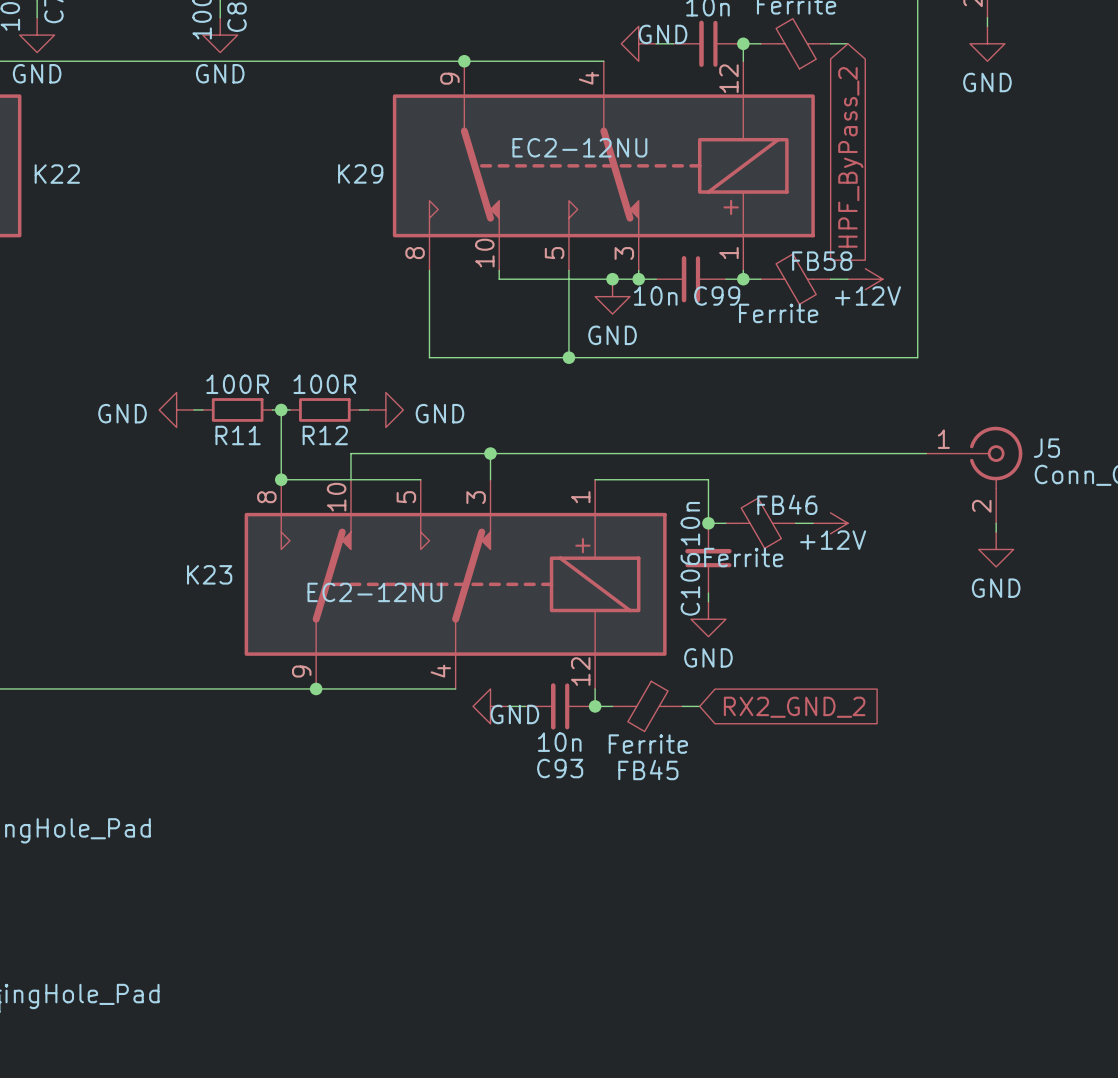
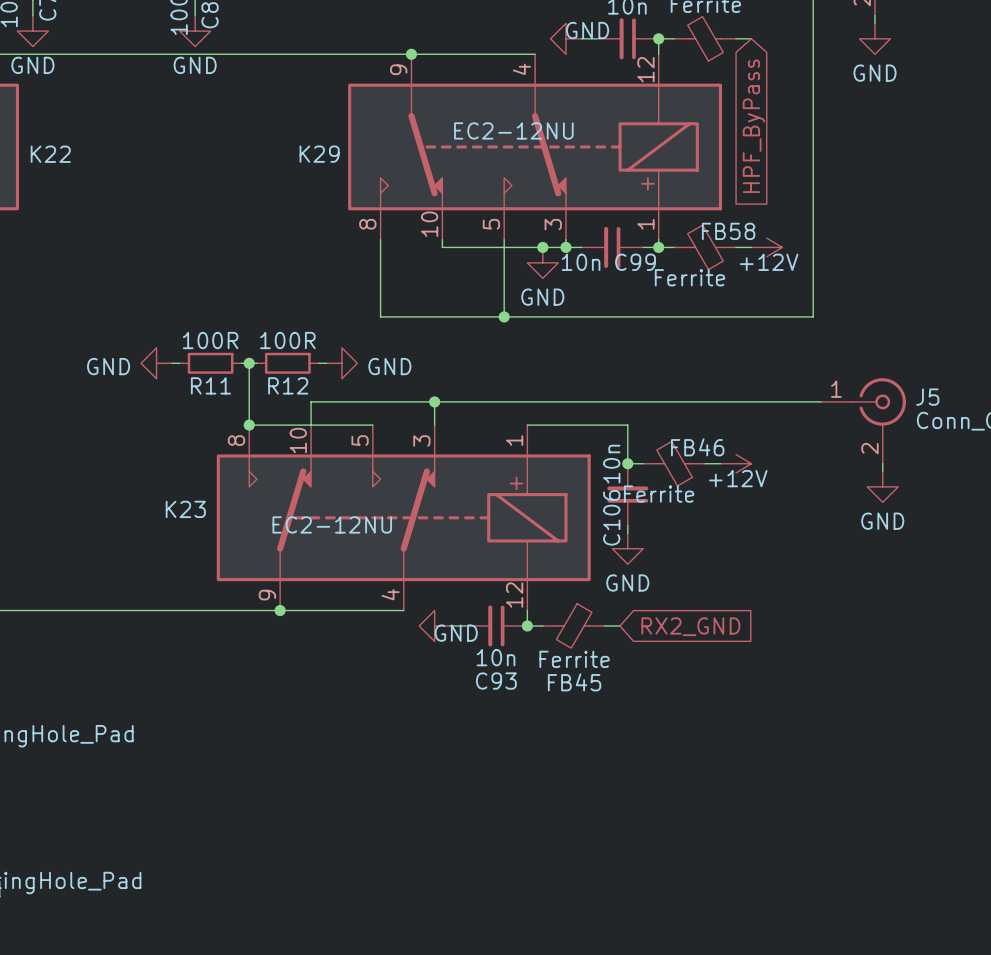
global label: HPF_ByPass_2 (850, 157) -> HPF_ByPass (753, 126)
global label: RX2_GND_2 (794, 707) -> RX2_GND (690, 626)

